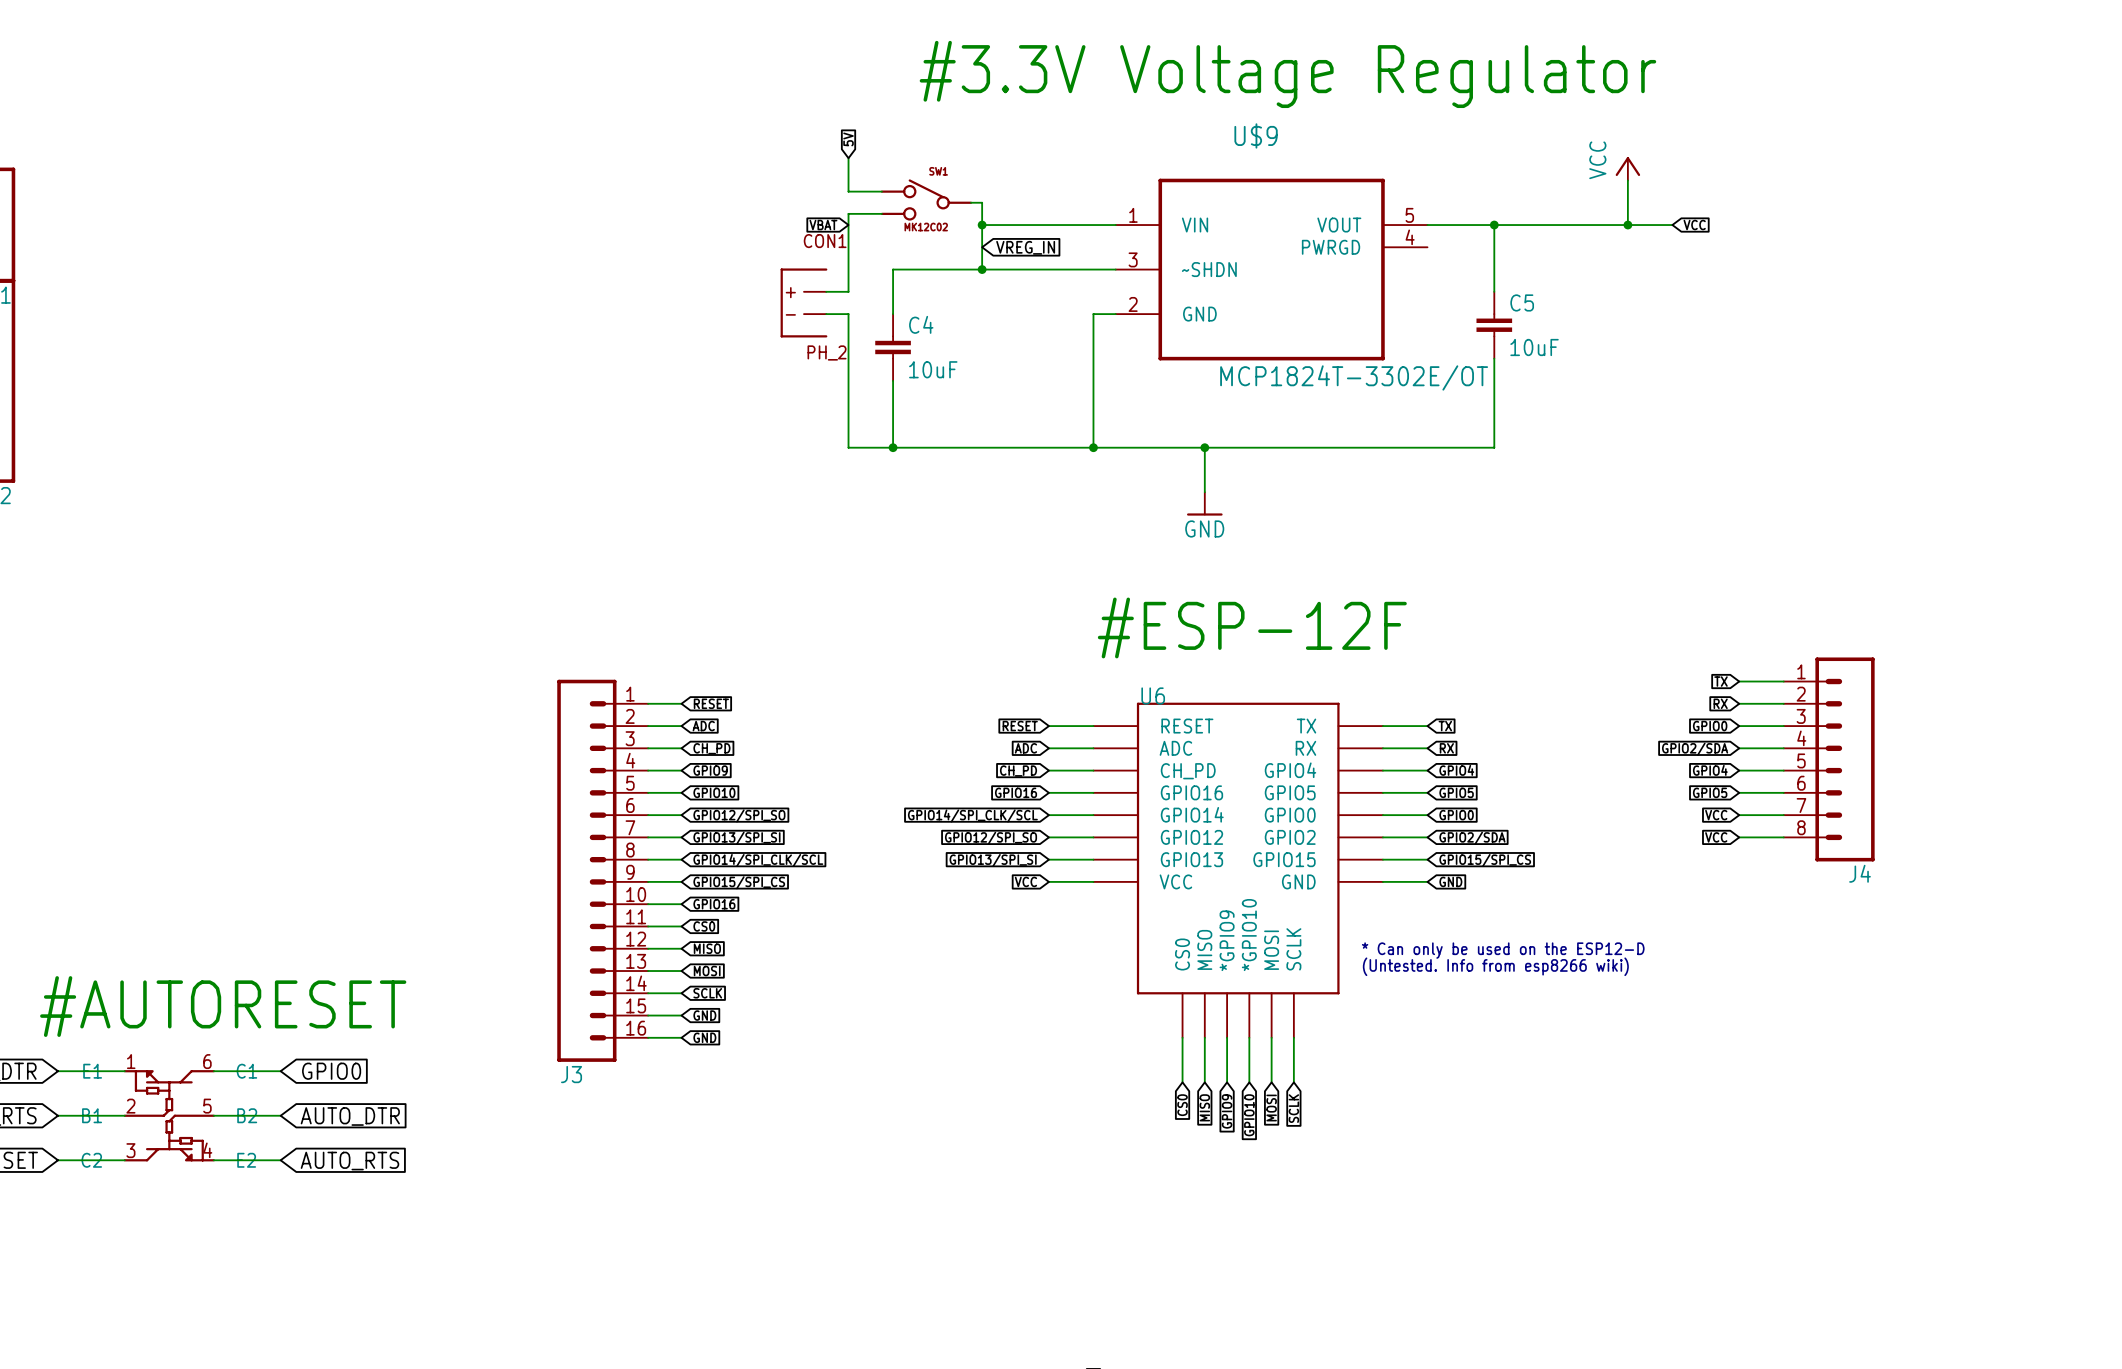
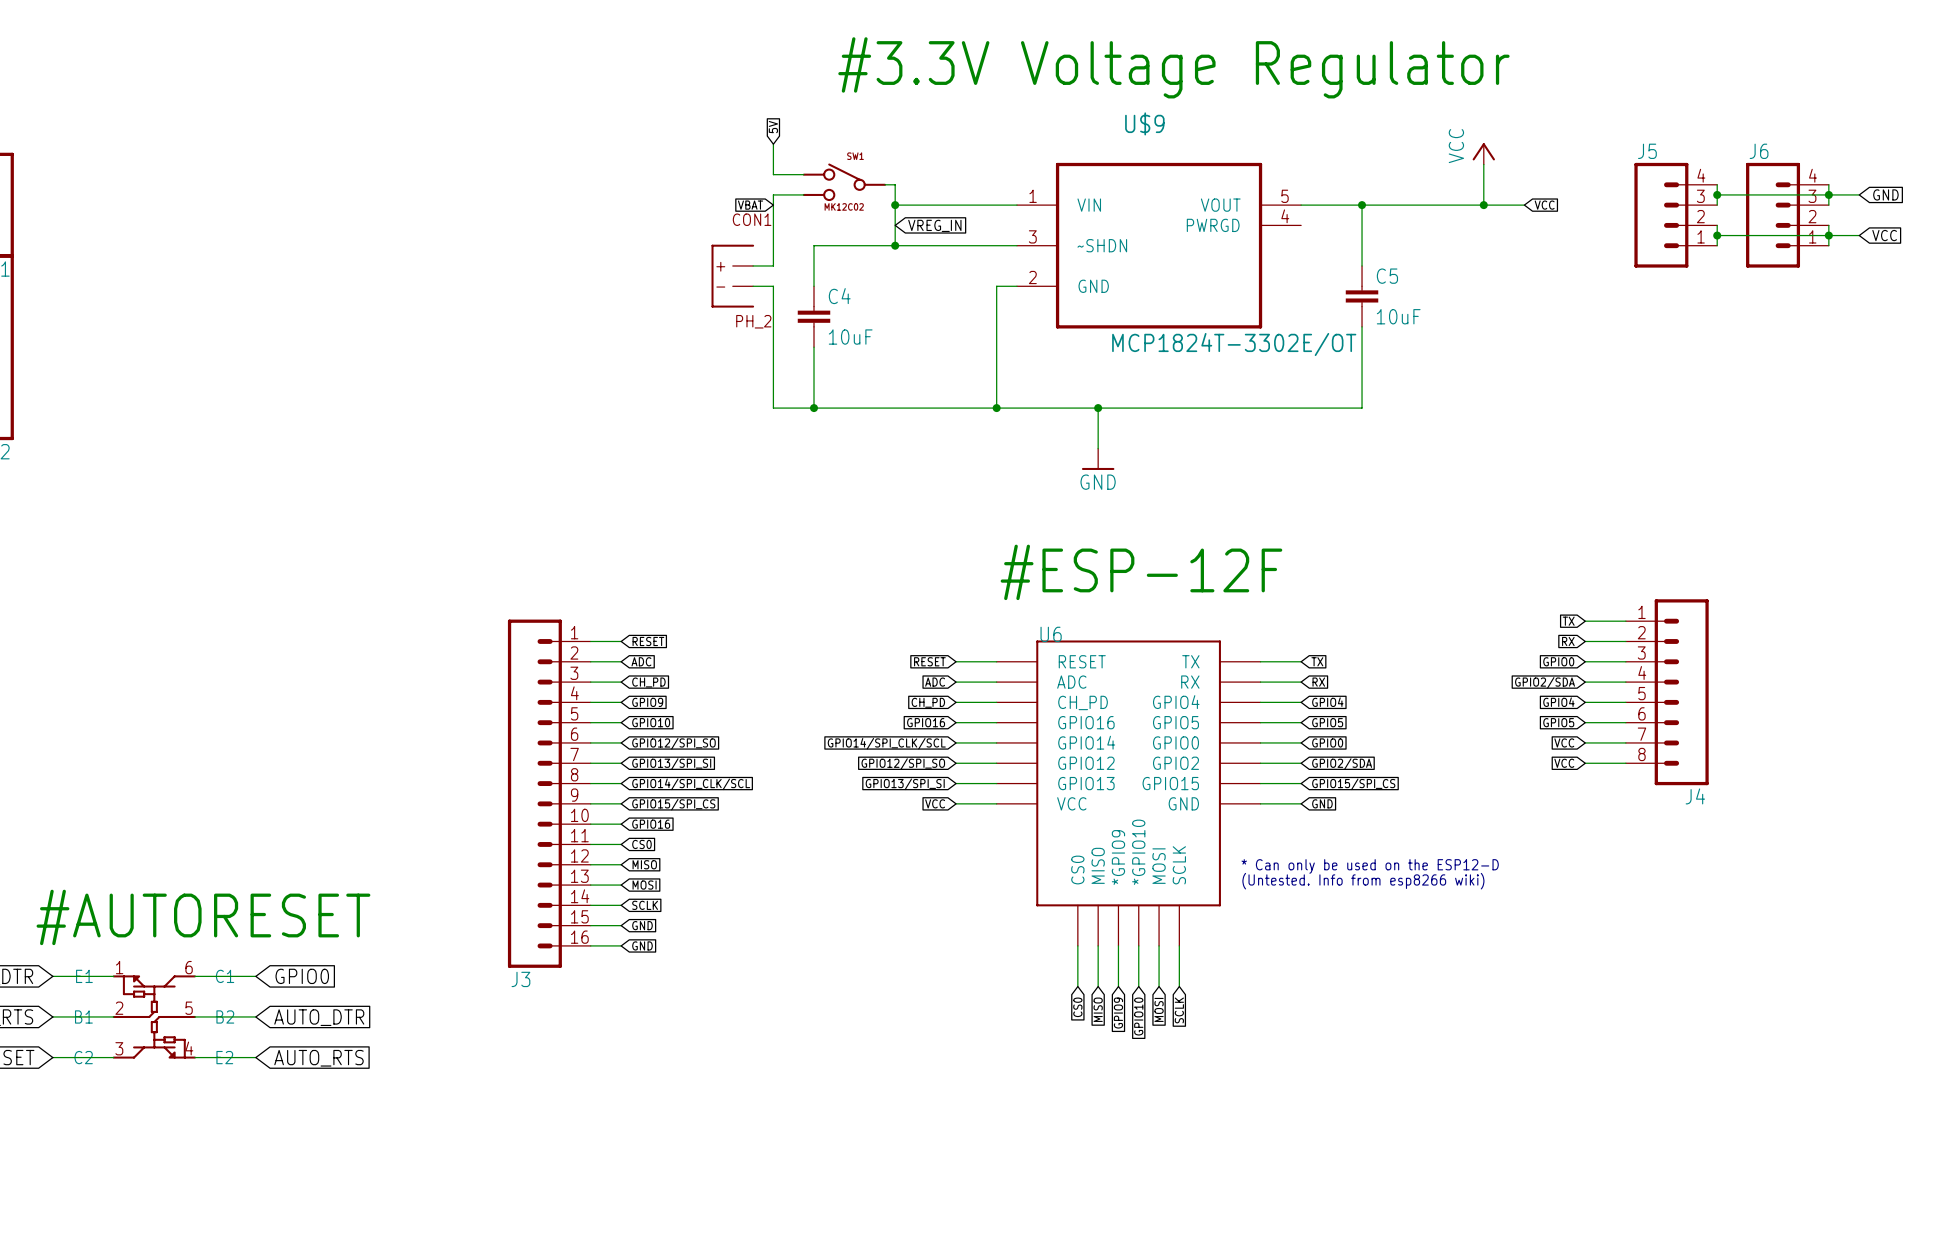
wire: none -> (1717, 184) (1717, 205)
wire: none -> (1828, 184) (1828, 205)
wire: none -> (1717, 194) (1859, 194)
junction: none -> (1717, 194)
junction: none -> (1828, 194)
global label: none -> GND (1885, 194)
J5: none -> (1675, 215)
J6: none -> (1787, 215)
wire: none -> (1717, 225) (1717, 245)
wire: none -> (1828, 225) (1828, 245)
wire: none -> (1717, 235) (1859, 235)
junction: none -> (1717, 235)
junction: none -> (1828, 235)
global label: none -> VCC (1884, 235)

